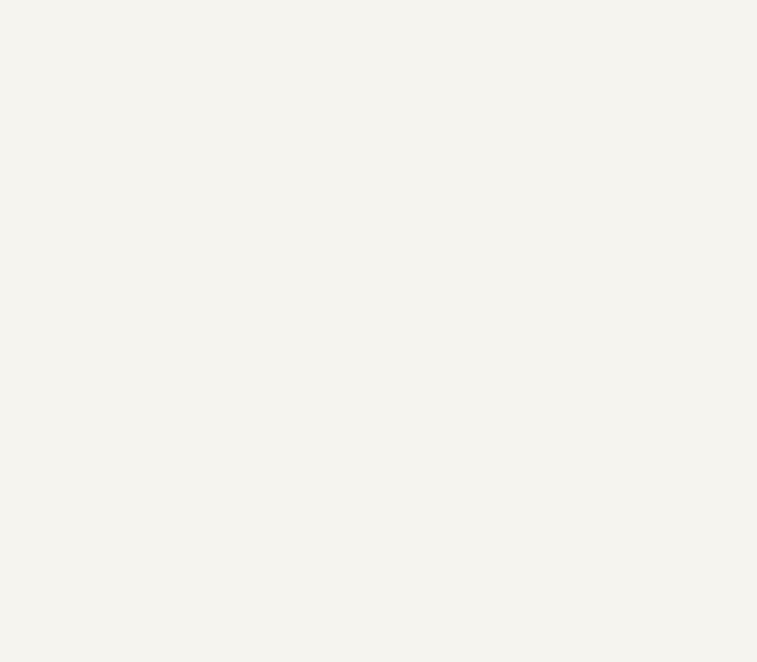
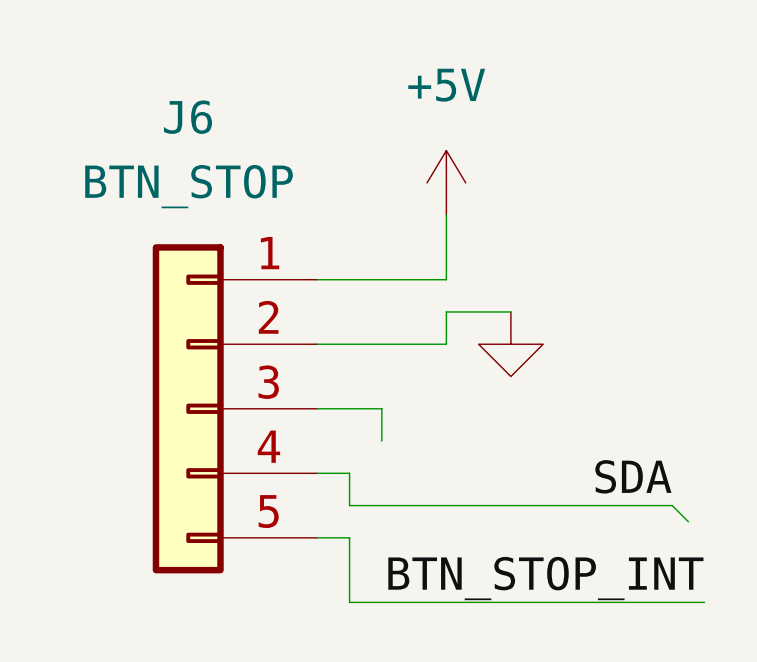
power symbol: none -> +5V (446, 182)
wire: none -> (446, 215) (446, 279) (317, 279)
wire: none -> (510, 311) (446, 311) (446, 344) (317, 344)
power symbol: none -> (510, 344)
J6: none -> BTN_STOP (235, 408)
wire: none -> (317, 408) (381, 408) (381, 441)
wire: none -> (317, 473) (349, 473) (349, 505) (672, 505) (688, 521)
label: none -> SDA (633, 476)
wire: none -> (317, 537) (349, 537) (349, 602) (704, 602)
label: none -> BTN_STOP_INT (545, 578)

